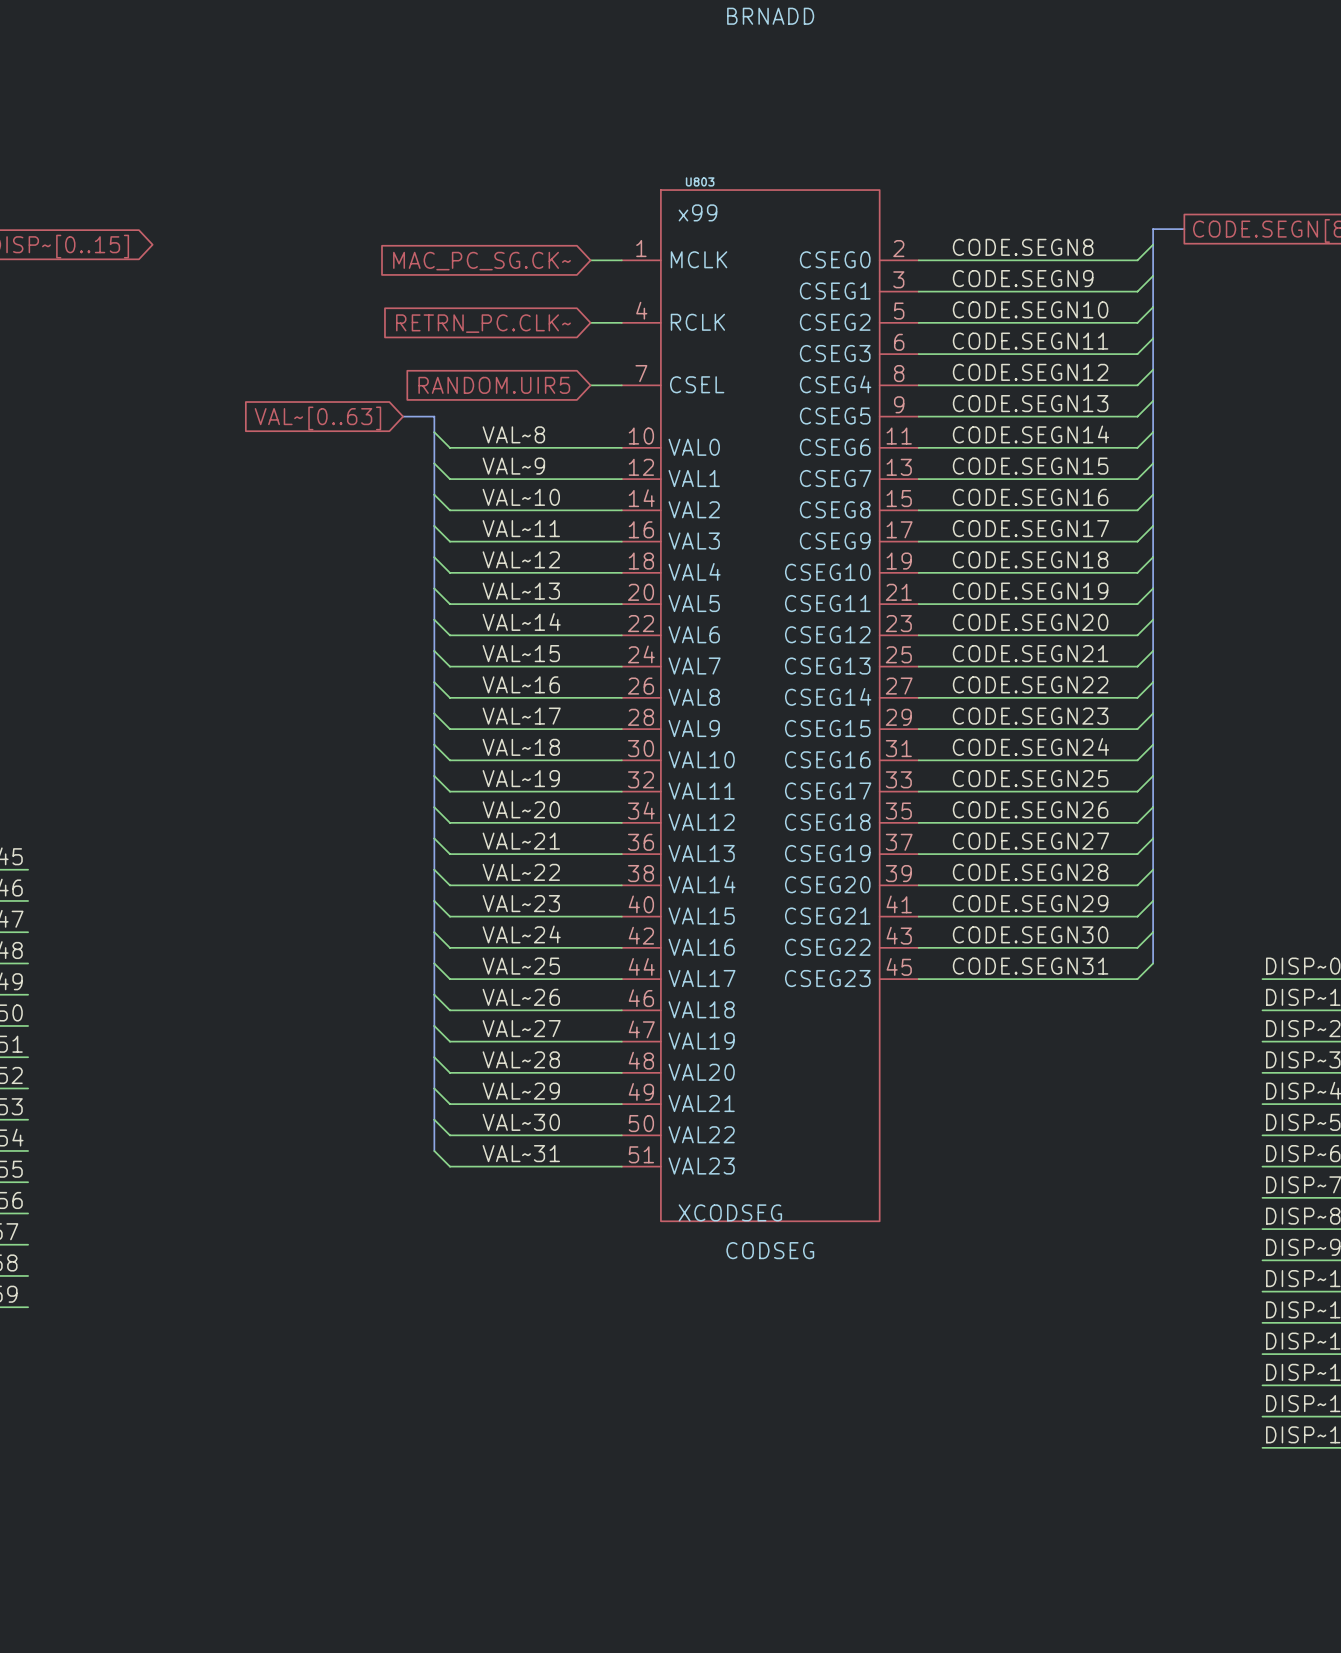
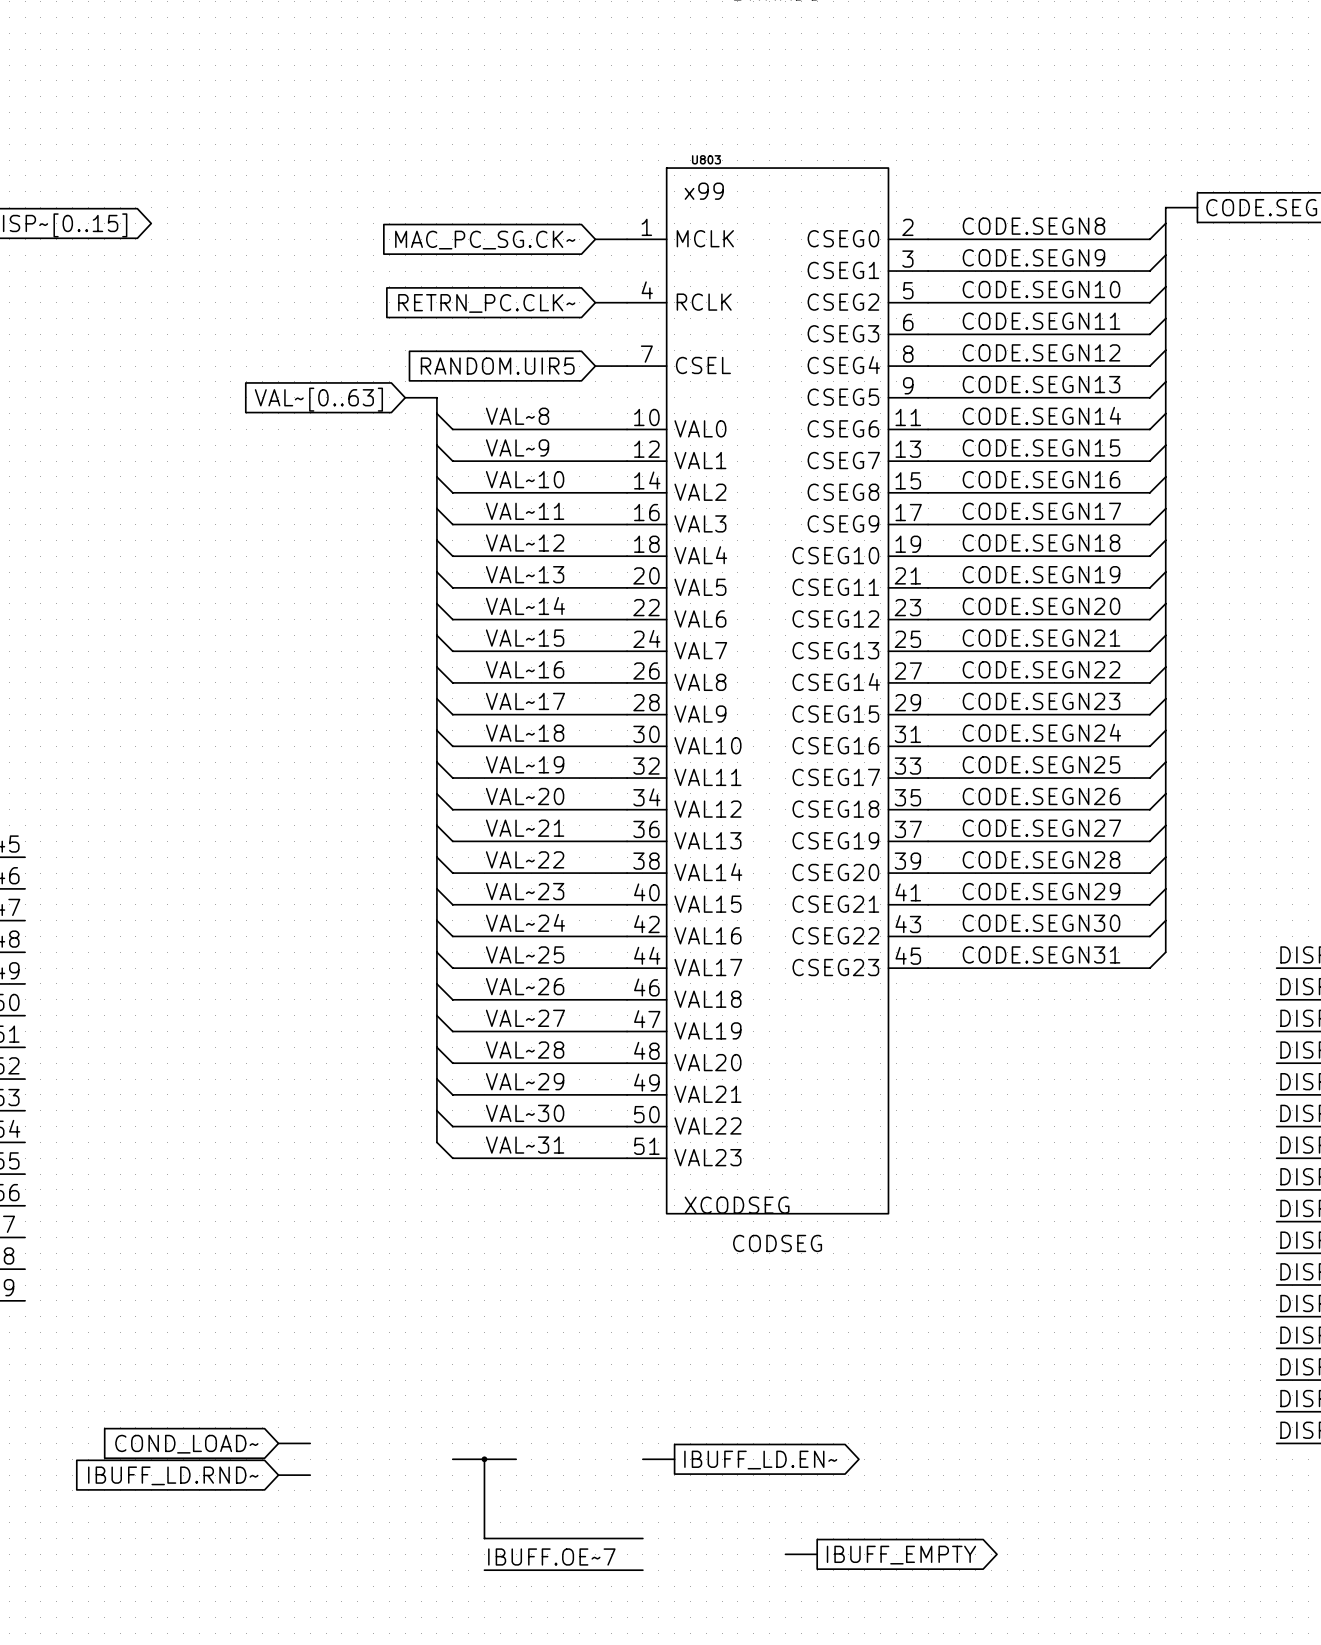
wire: none -> (278, 1443) (310, 1443)
global label: none -> COND_LOAD~ (186, 1444)
wire: none -> (452, 1459) (516, 1459)
wire: none -> (484, 1459) (484, 1538) (642, 1538)
junction: none -> (484, 1459)
wire: none -> (642, 1459) (674, 1459)
global label: none -> IBUFF_LD.EN~ (760, 1460)
global label: none -> IBUFF_LD.RND~ (173, 1475)
wire: none -> (278, 1475) (310, 1475)
wire: none -> (785, 1554) (817, 1554)
global label: none -> IBUFF_EMPTY (901, 1555)
label: none -> IBUFF.OE~7 (551, 1556)
wire: none -> (484, 1570) (642, 1570)

